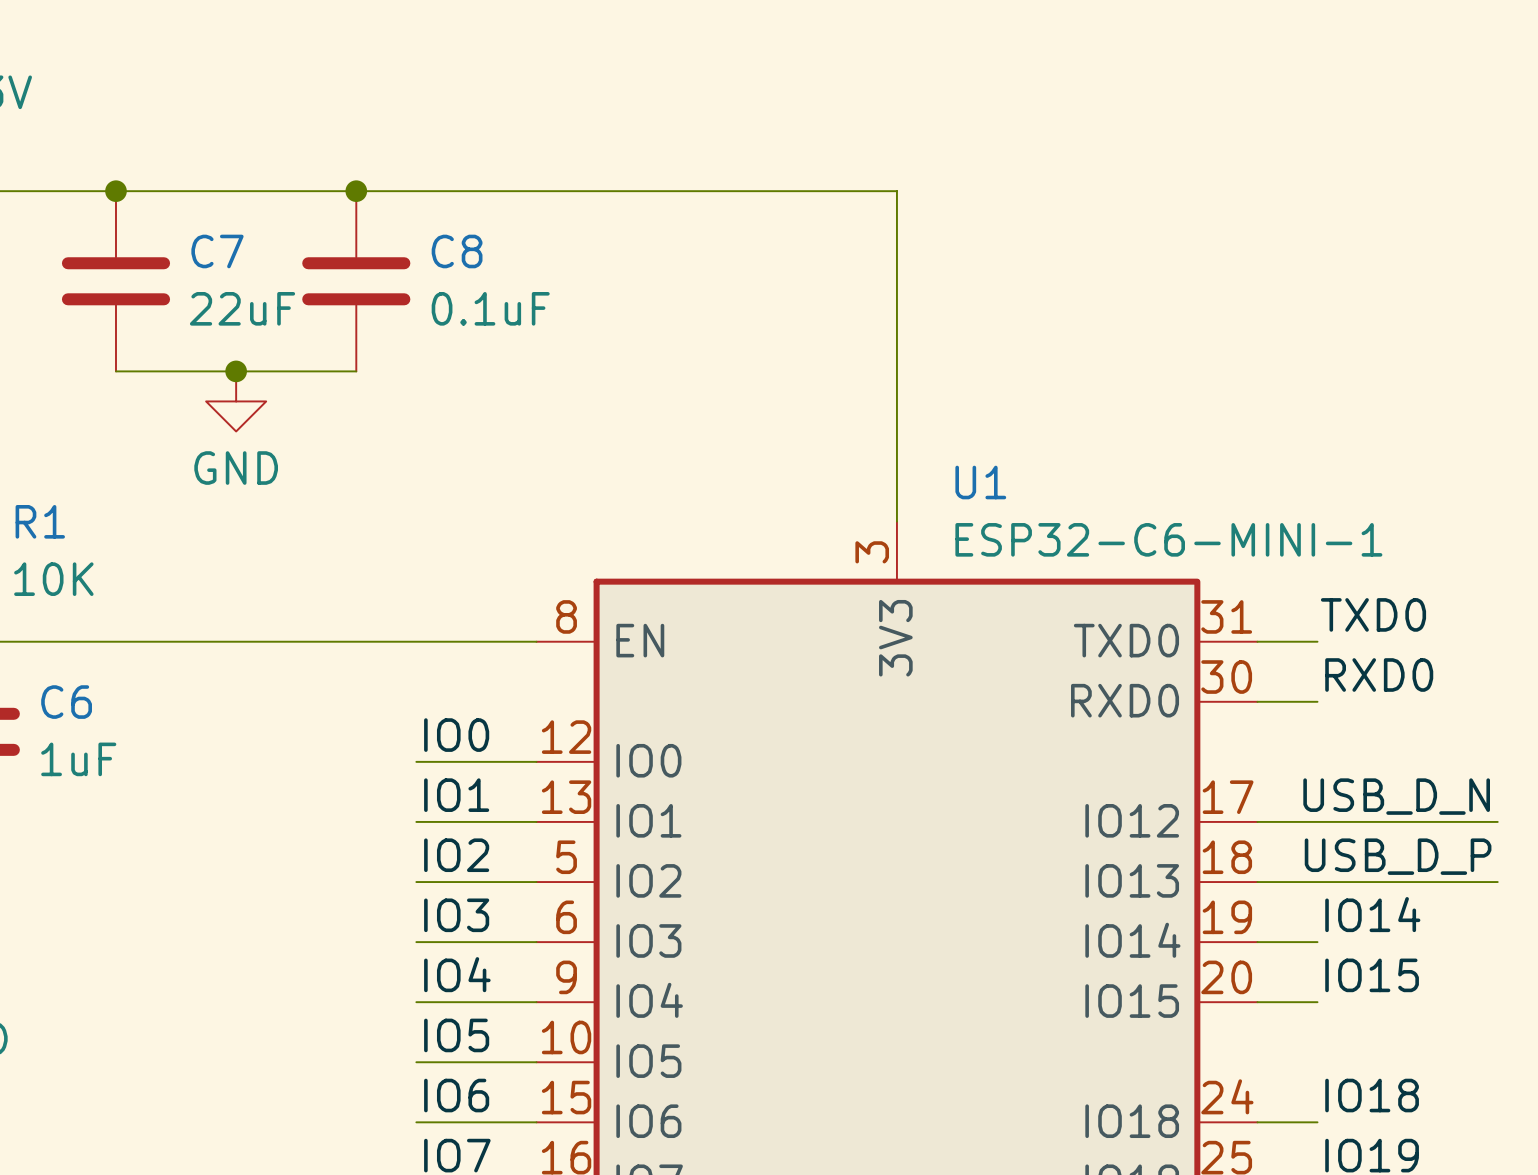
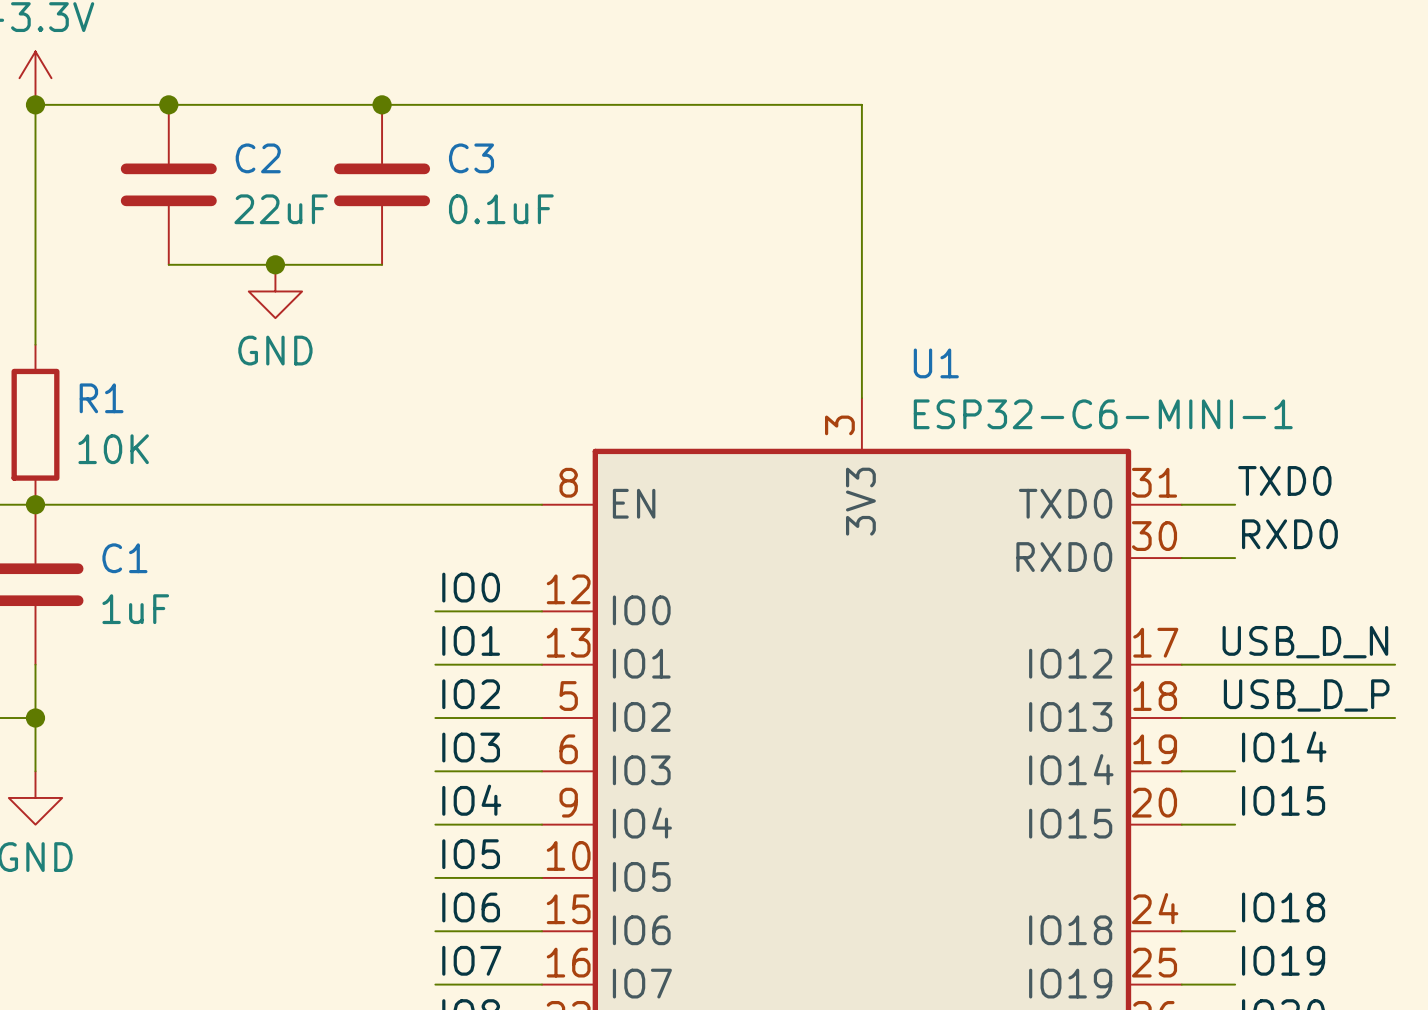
C7 name: C7 (217, 251) -> C2 (258, 158)
C8 name: C8 (457, 251) -> C3 (471, 158)
C6 name: C6 (66, 702) -> C1 (124, 558)

